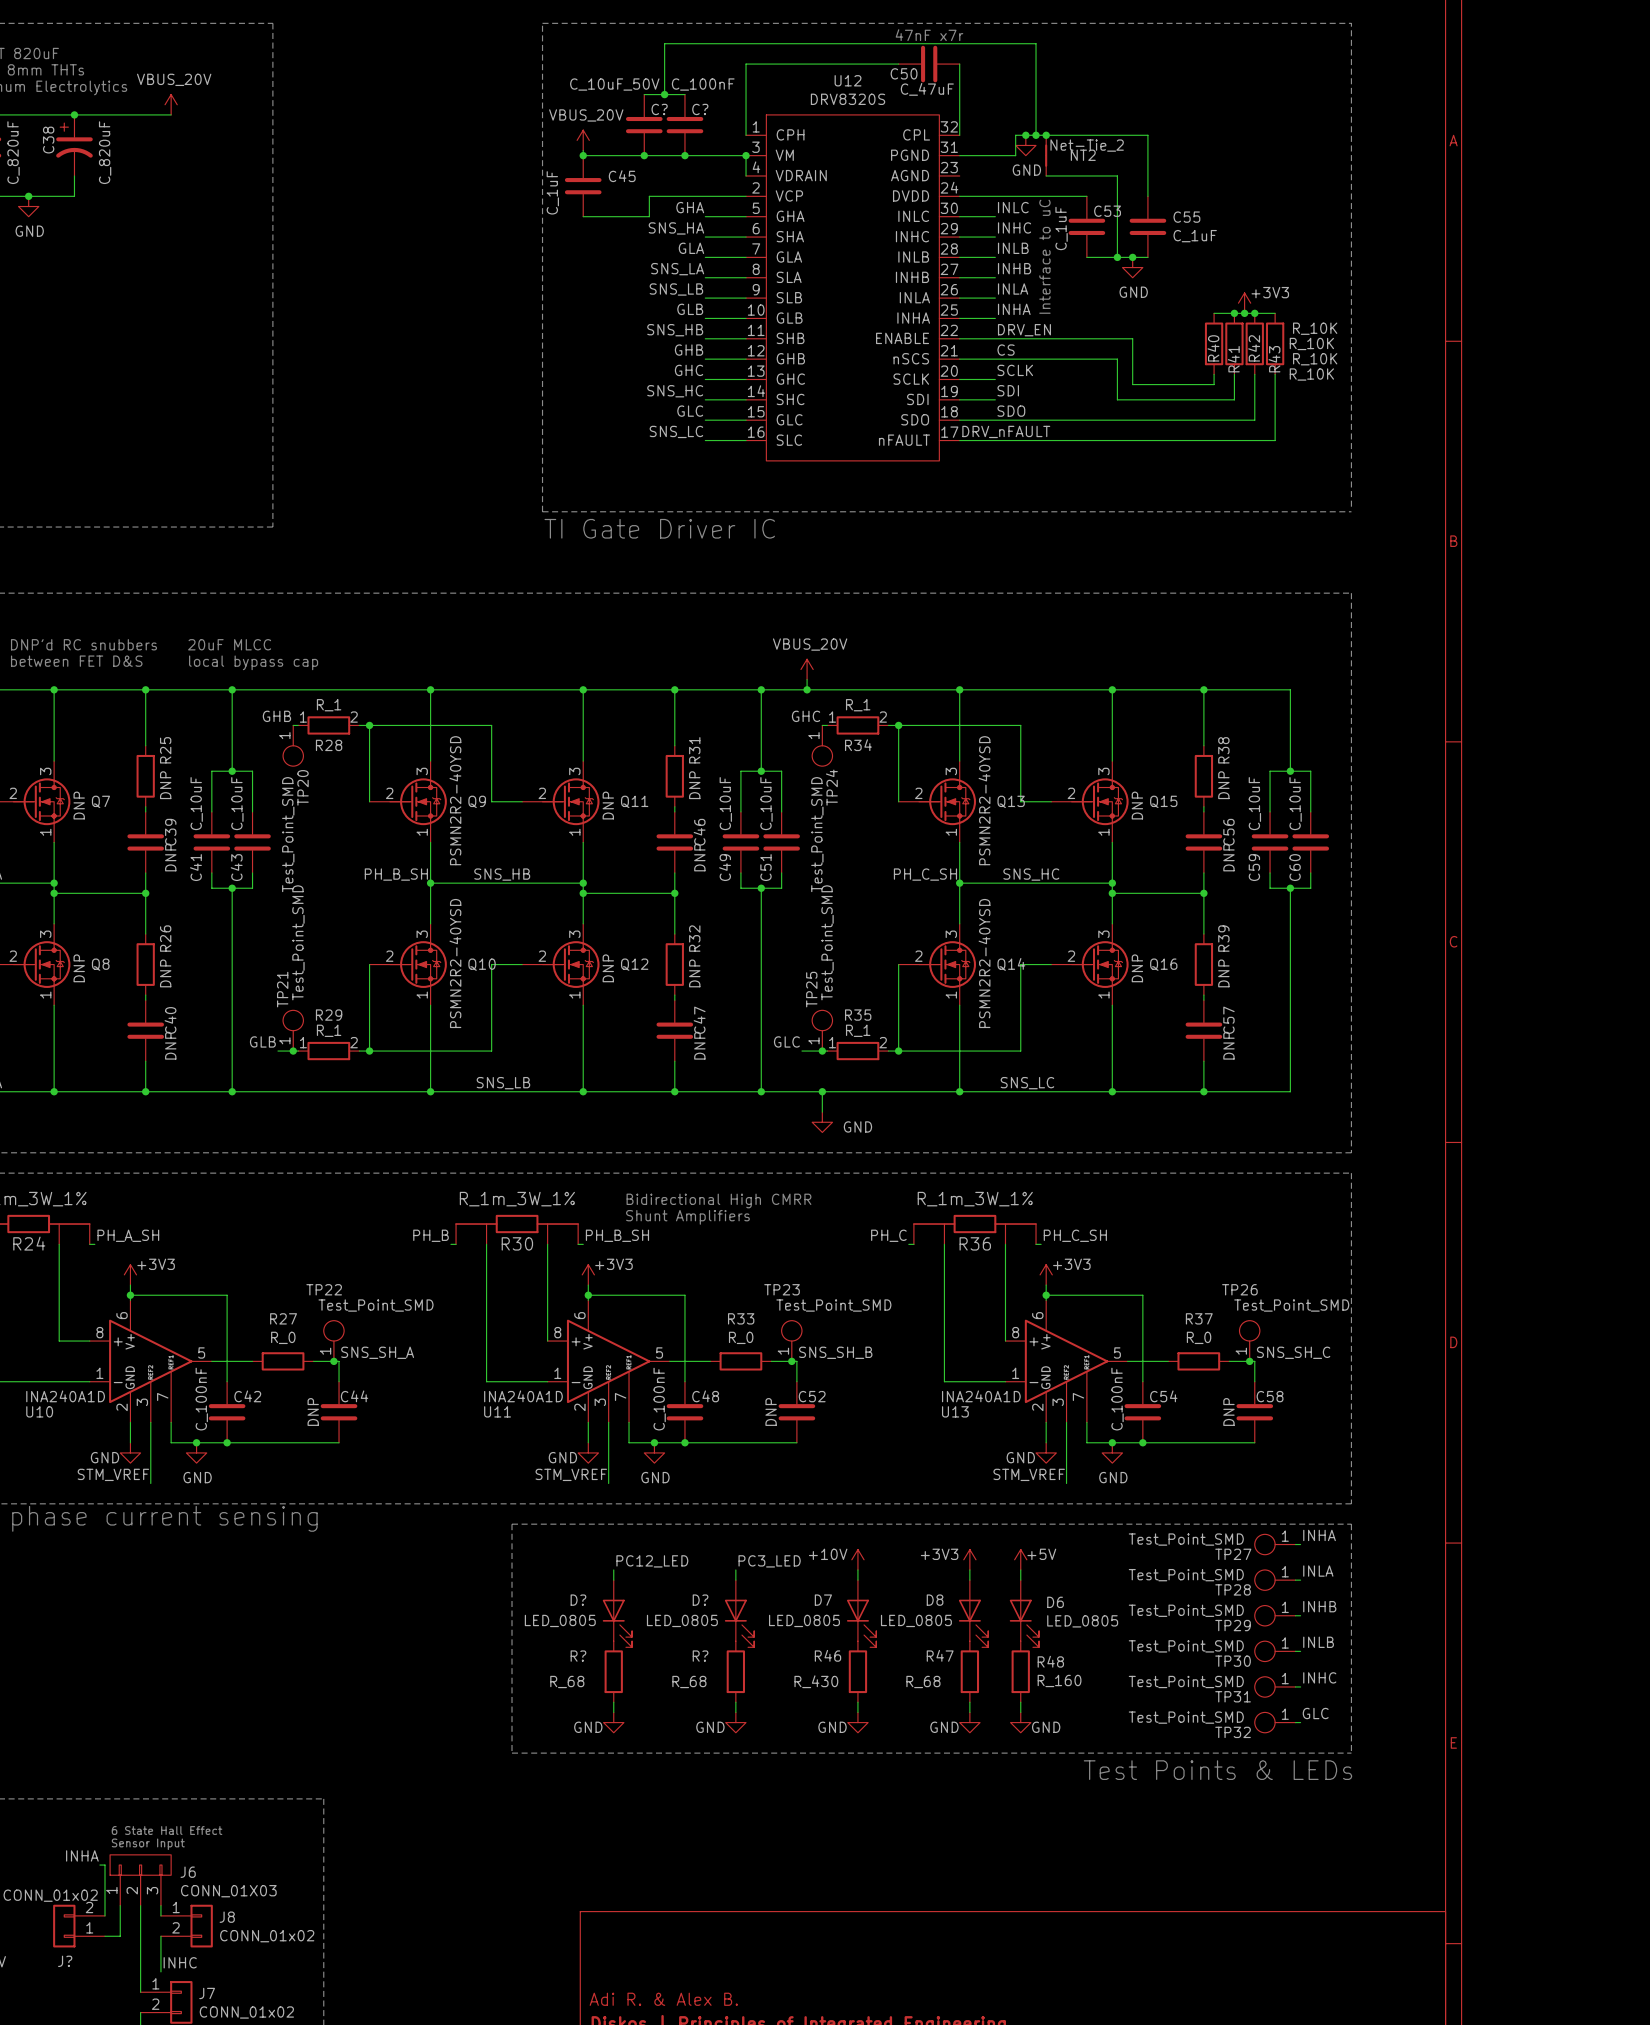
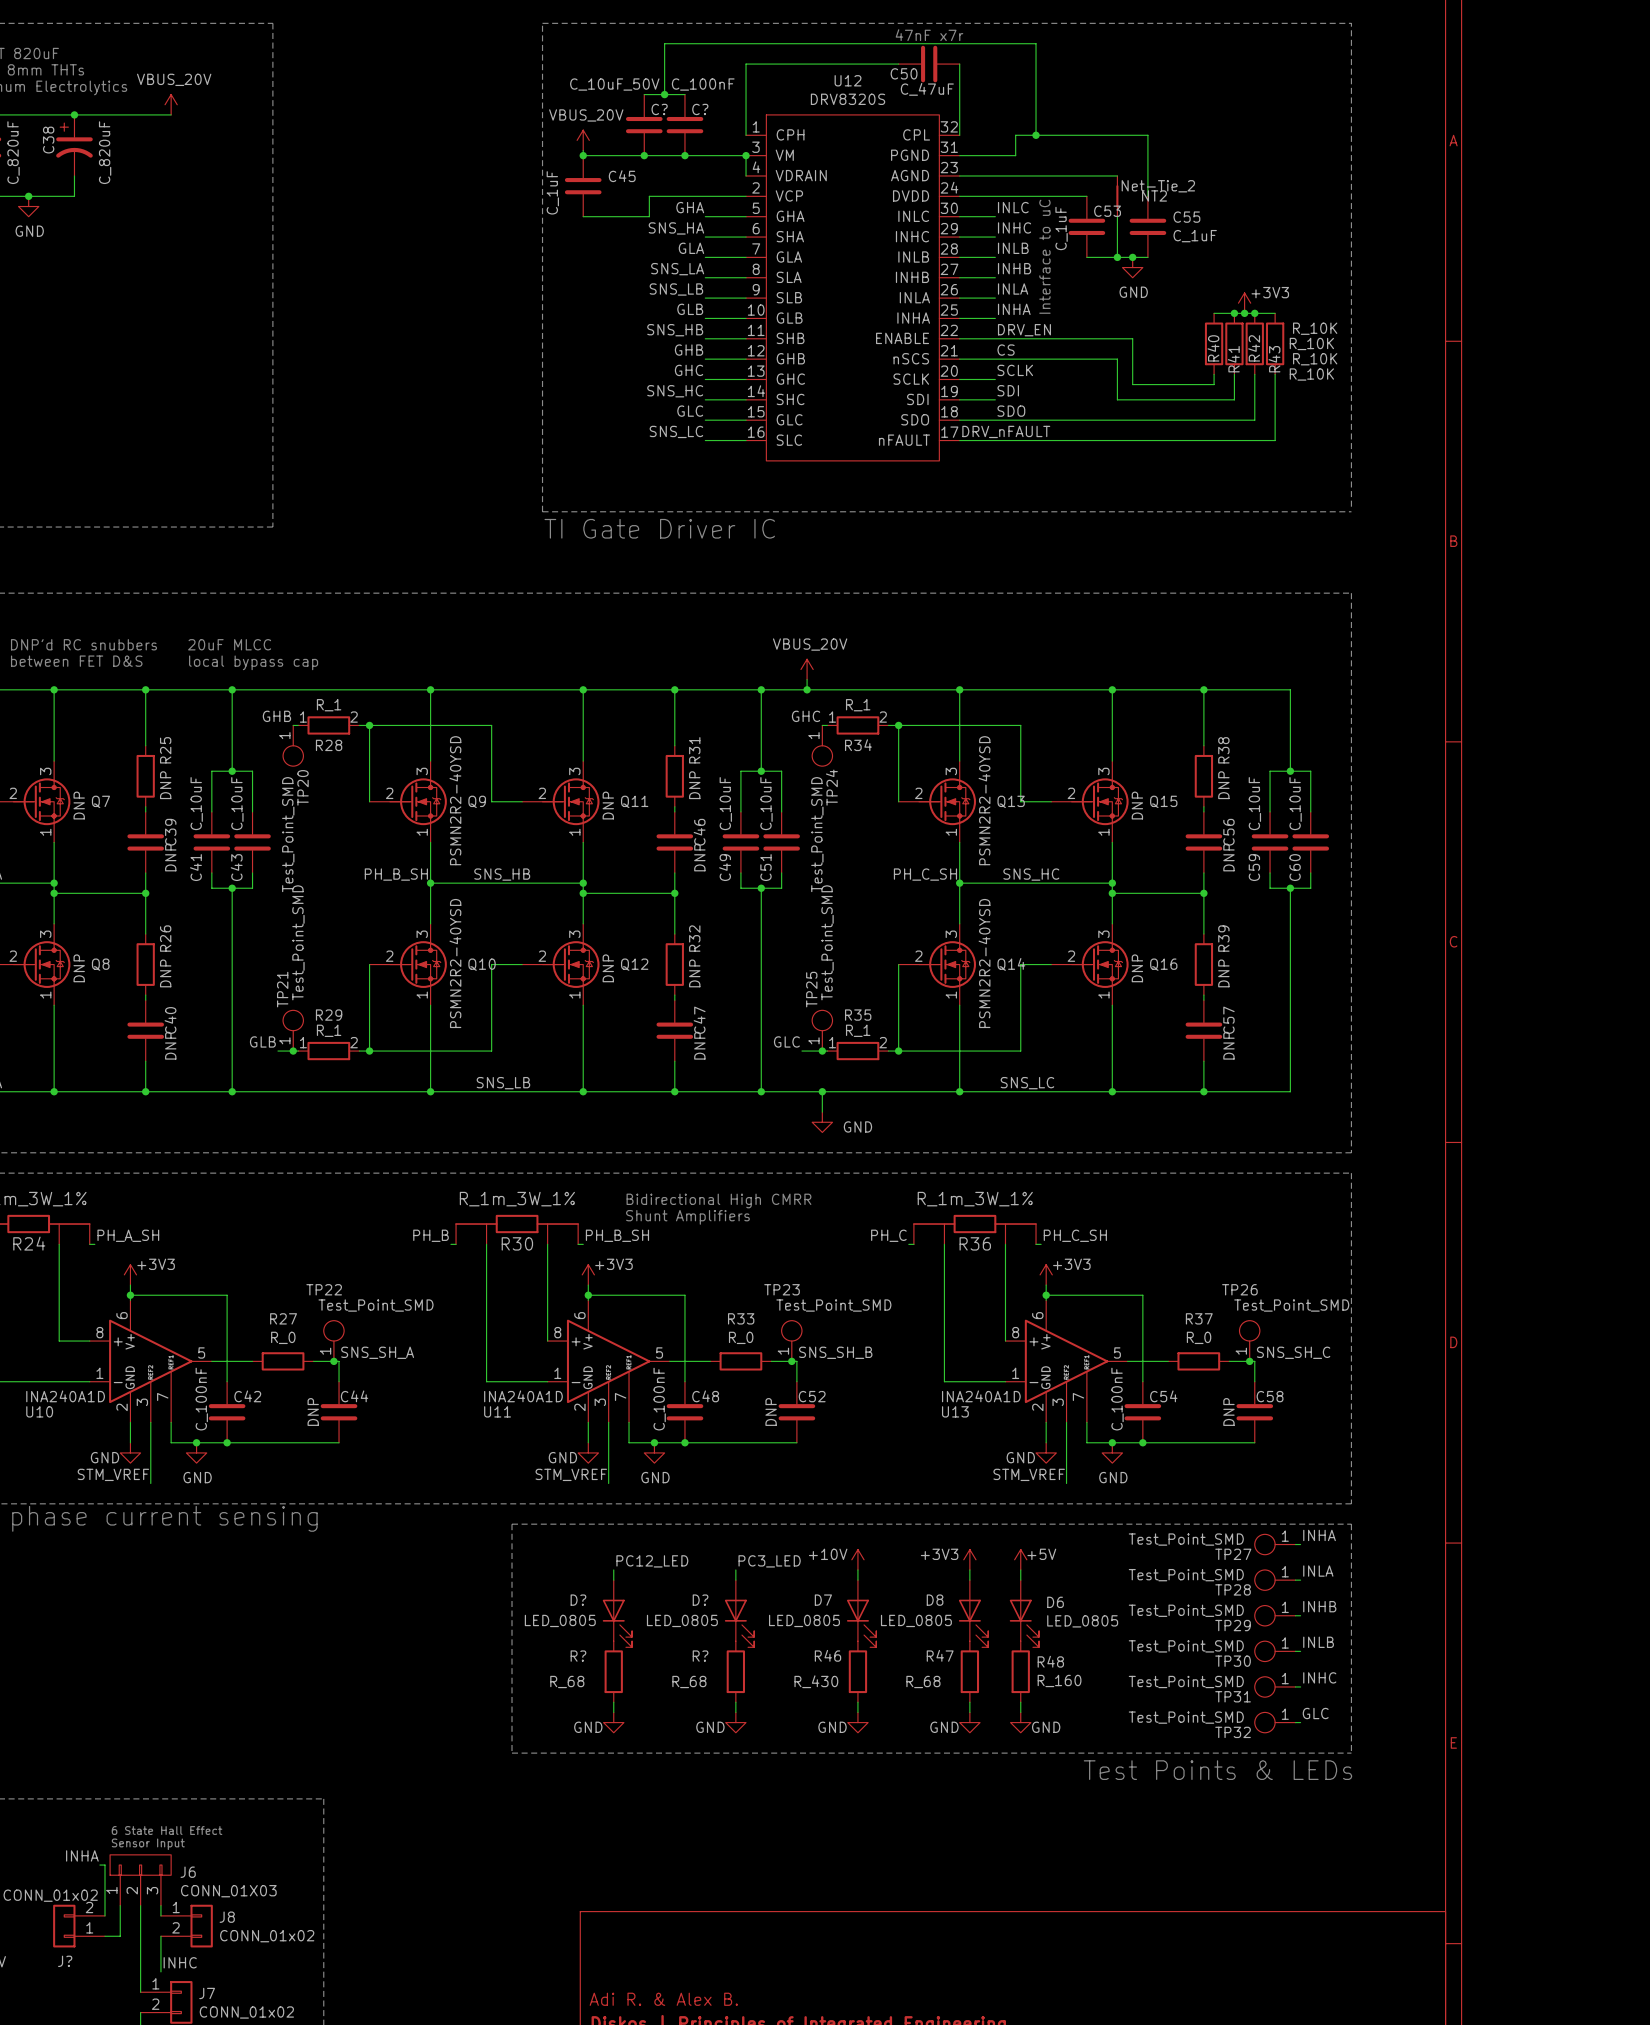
junction: (1025, 135) -> none
junction: (1046, 135) -> none
power symbol: GND (1025, 145) -> none
NT2 position: (1046, 155) -> (1117, 196)
wire: none -> (959, 175) (1046, 175)

